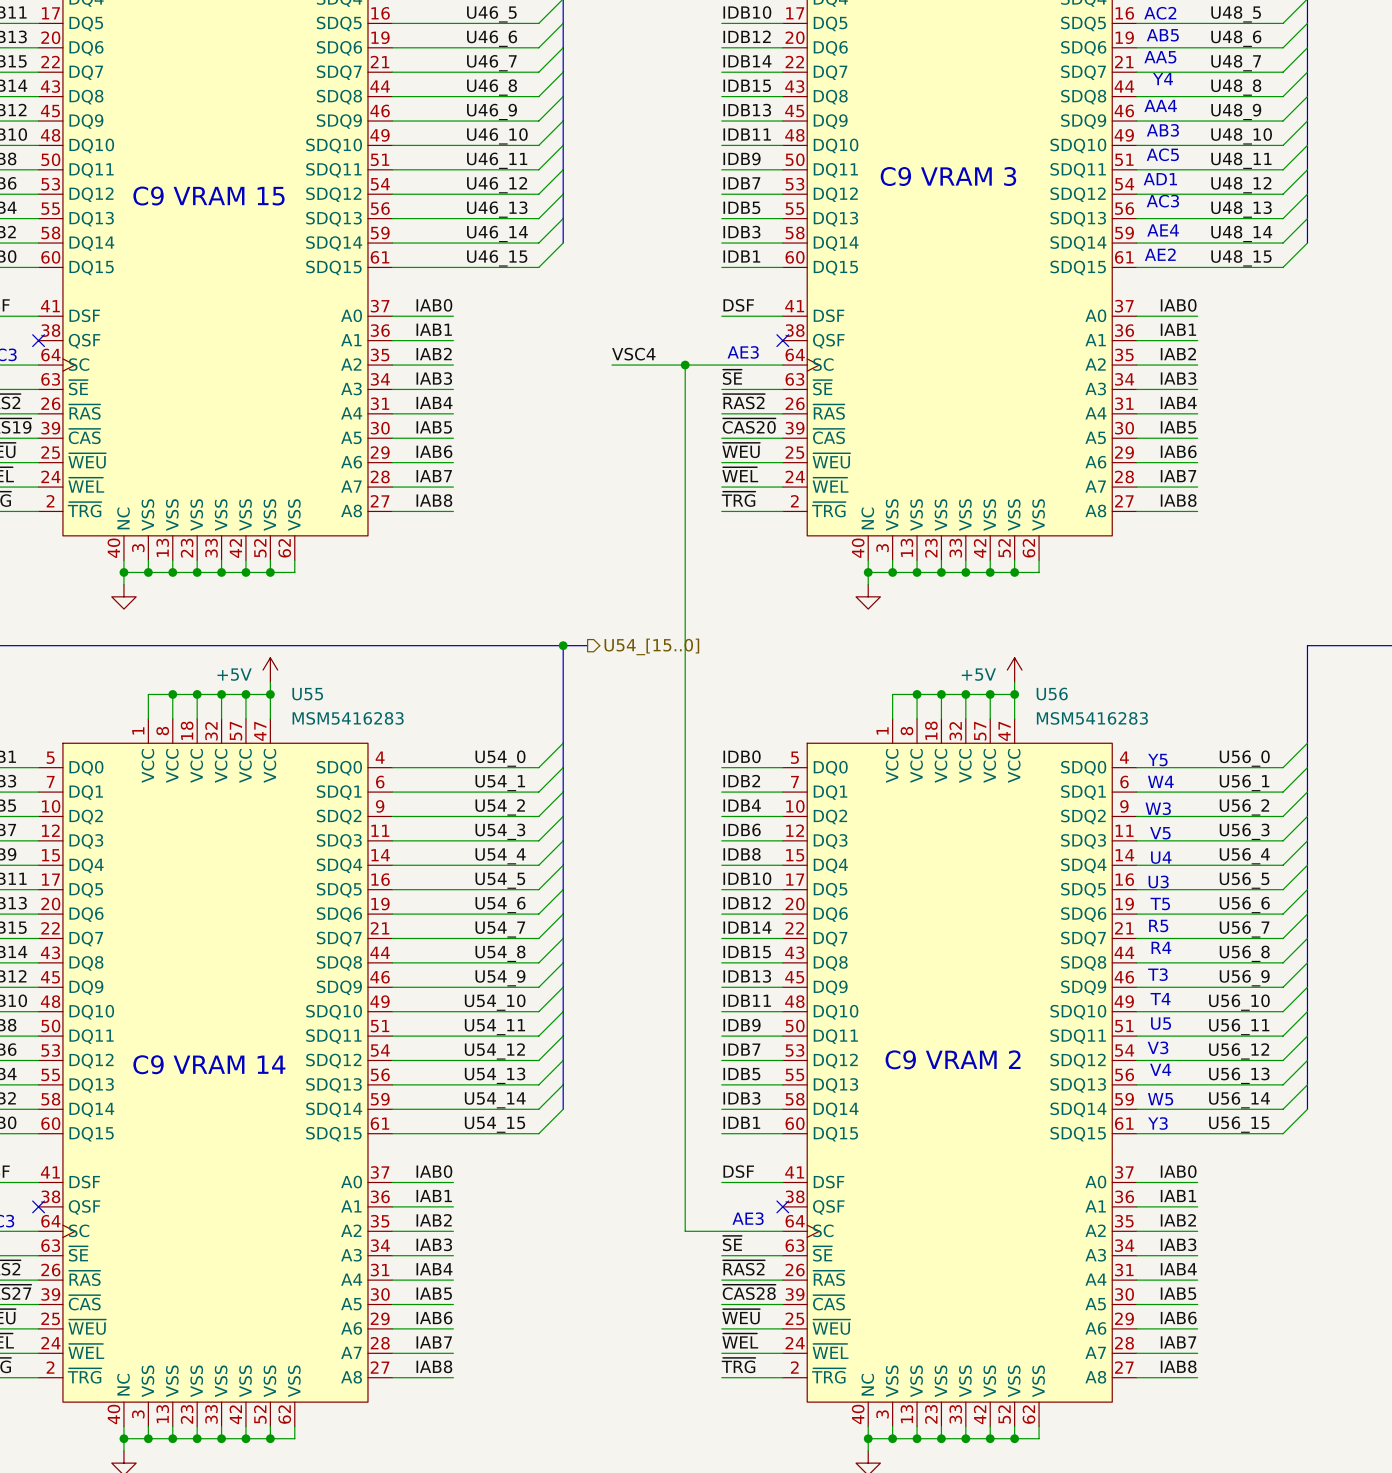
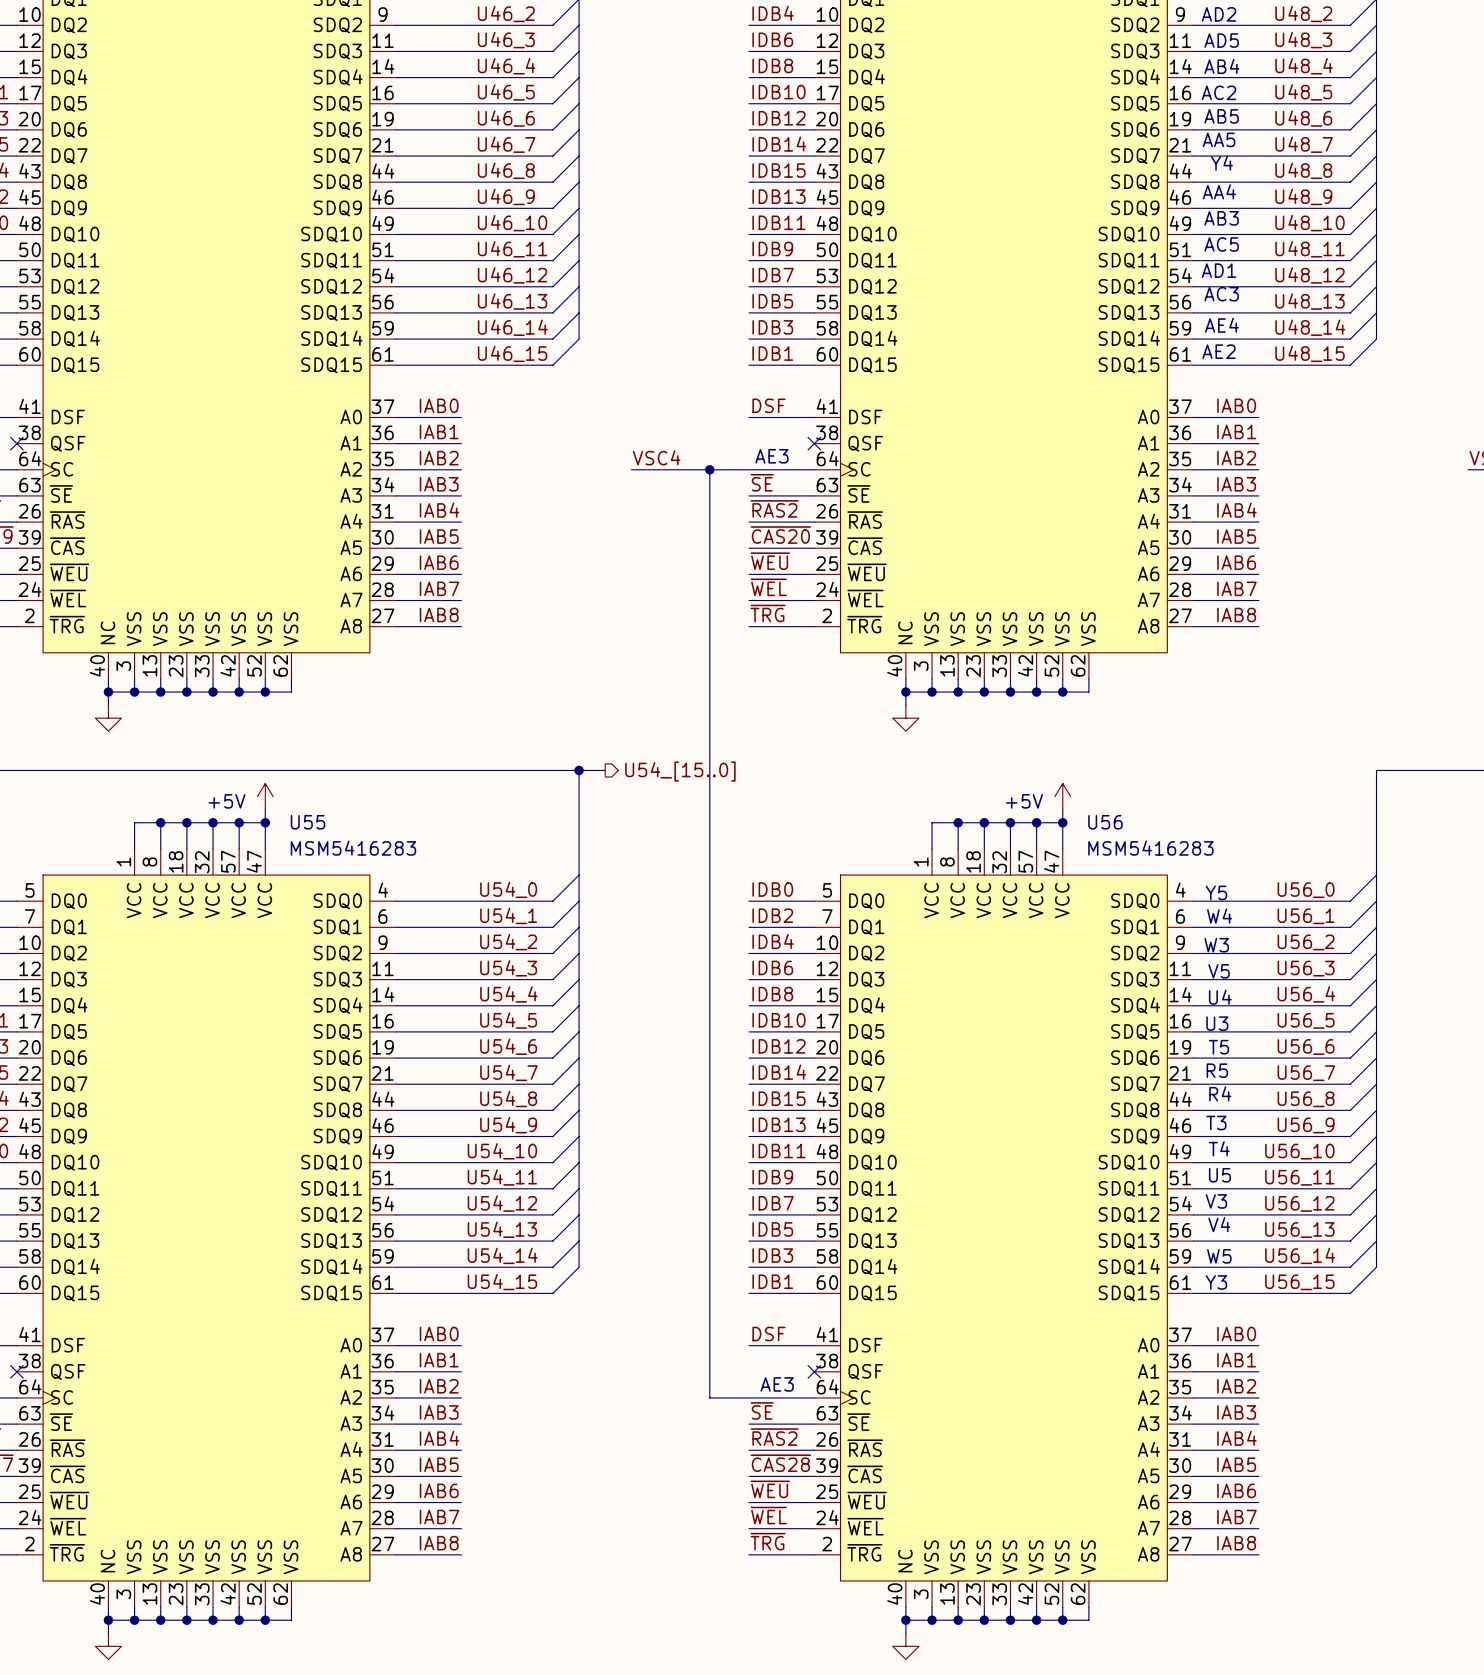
text: C9 VRAM 3 (948, 176) -> none
text: C9 VRAM 15 (208, 196) -> none
text: C9 VRAM 2 (953, 1059) -> none
text: C9 VRAM 14 (209, 1064) -> none

